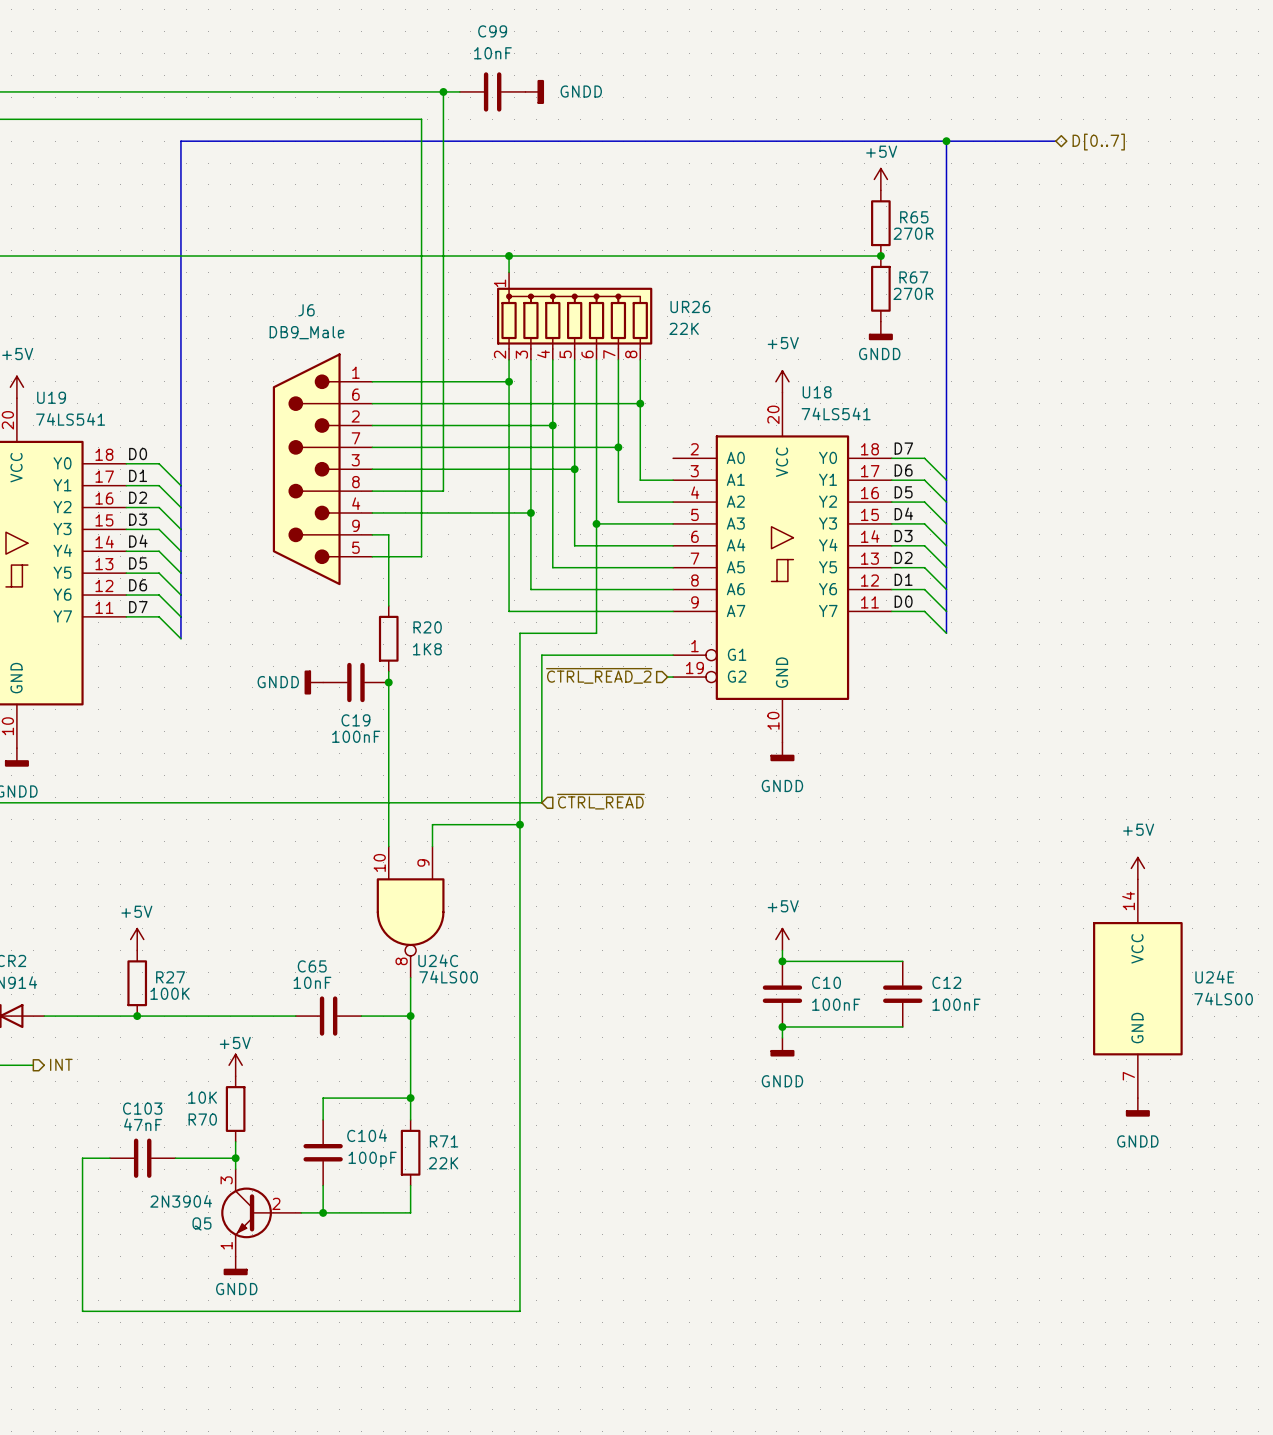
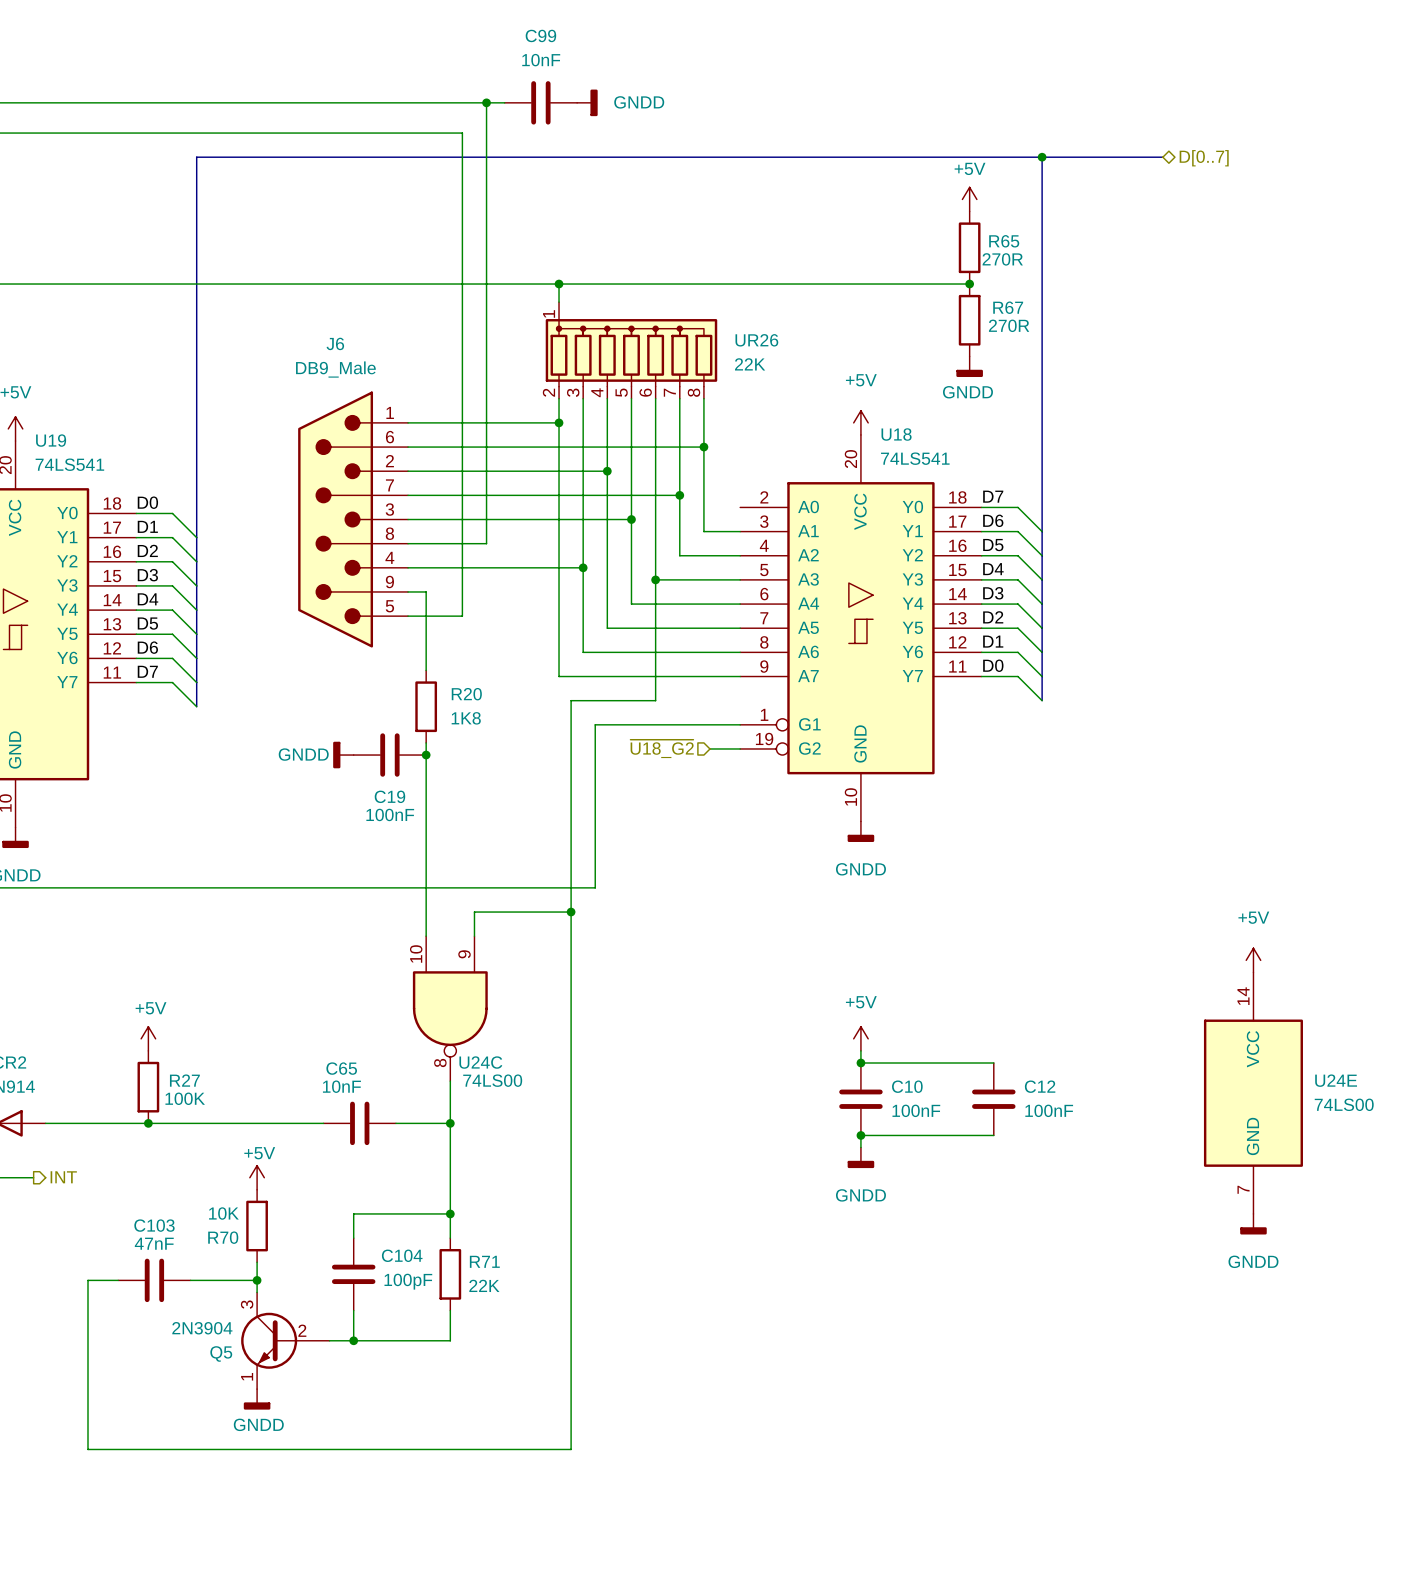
hierarchical label: ~{CTRL_READ_2} (599, 675) -> none
hierarchical label: none -> ~{U18_G2} (662, 748)
wire: none -> (709, 748) (734, 748)
hierarchical label: ~{CTRL_READ} (600, 801) -> none

